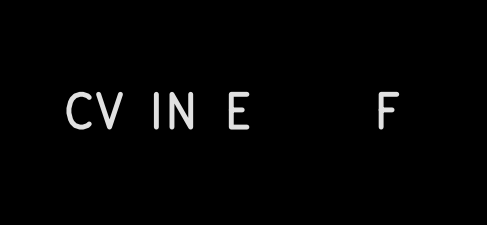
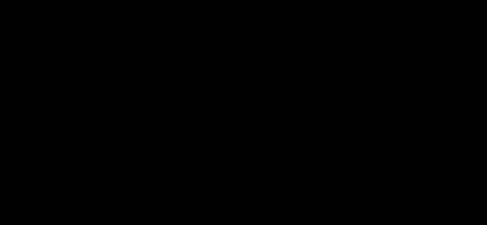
text: CV IN E (157, 110) -> none
text: F (388, 110) -> none

